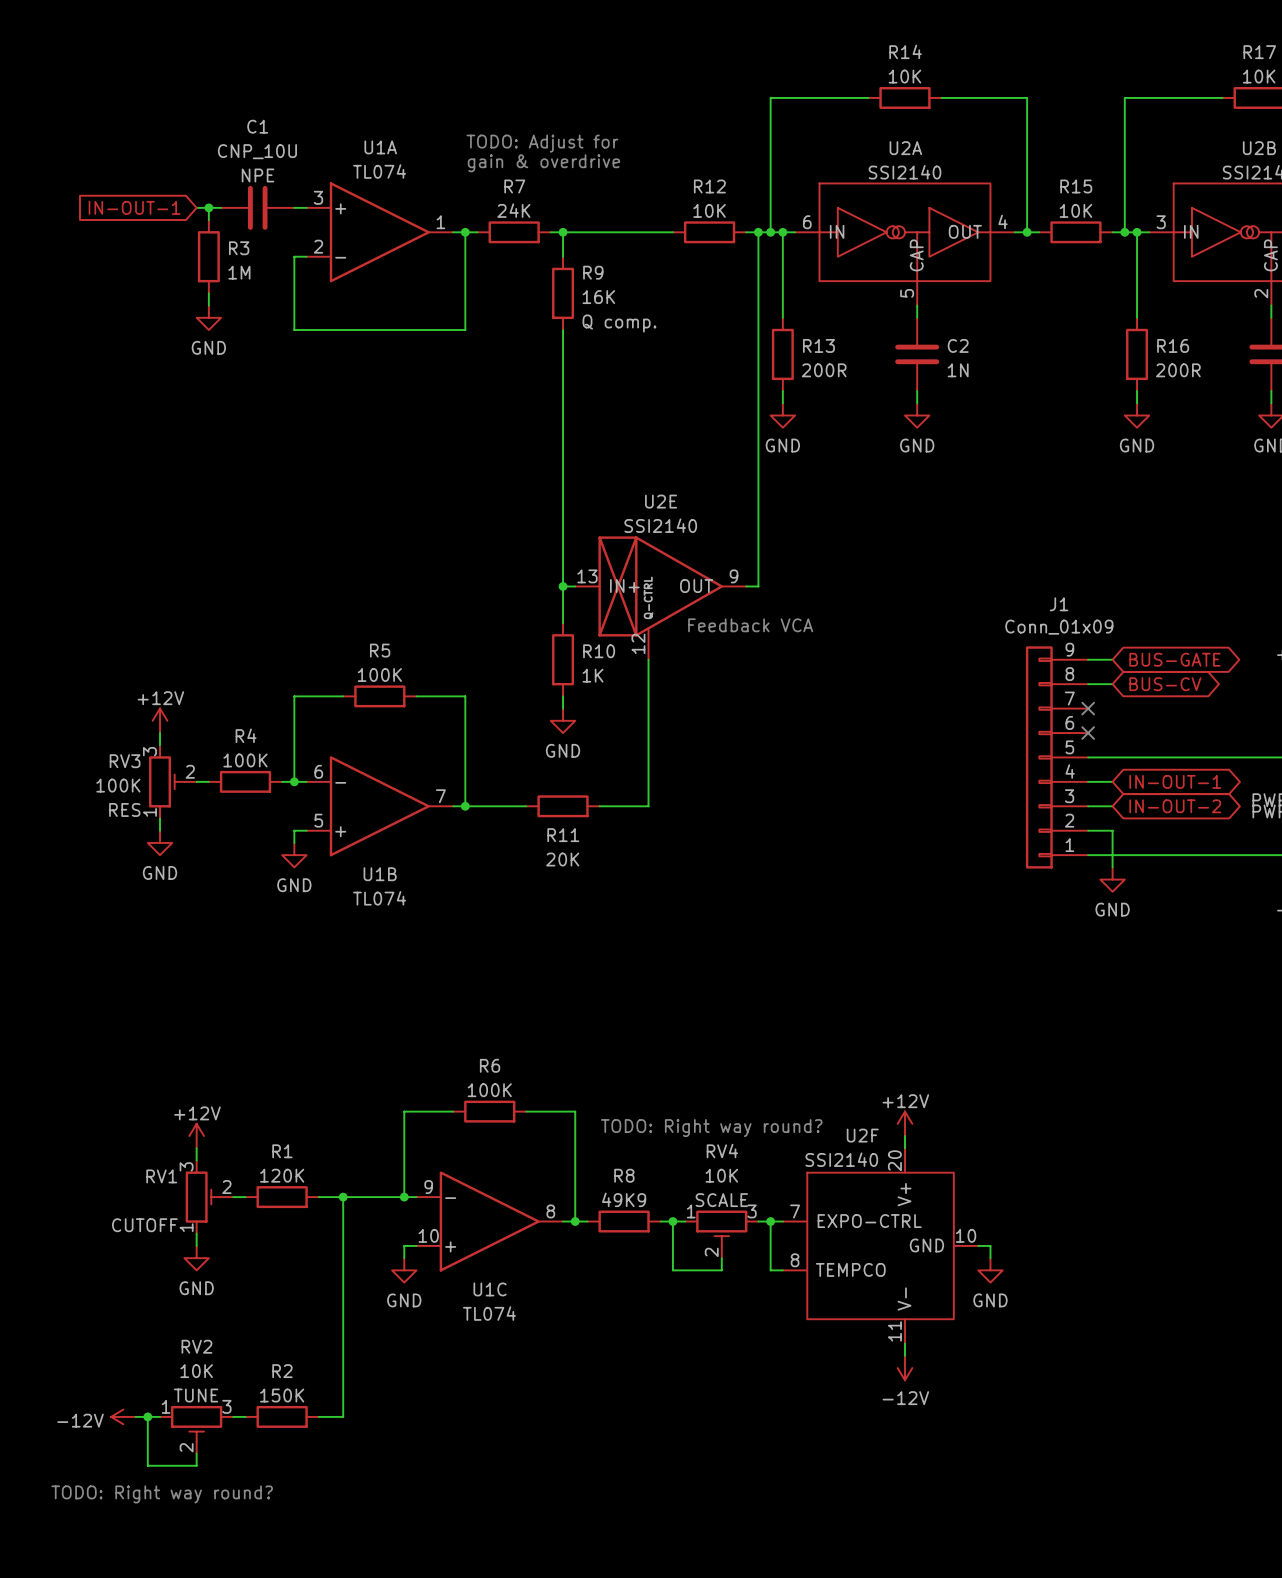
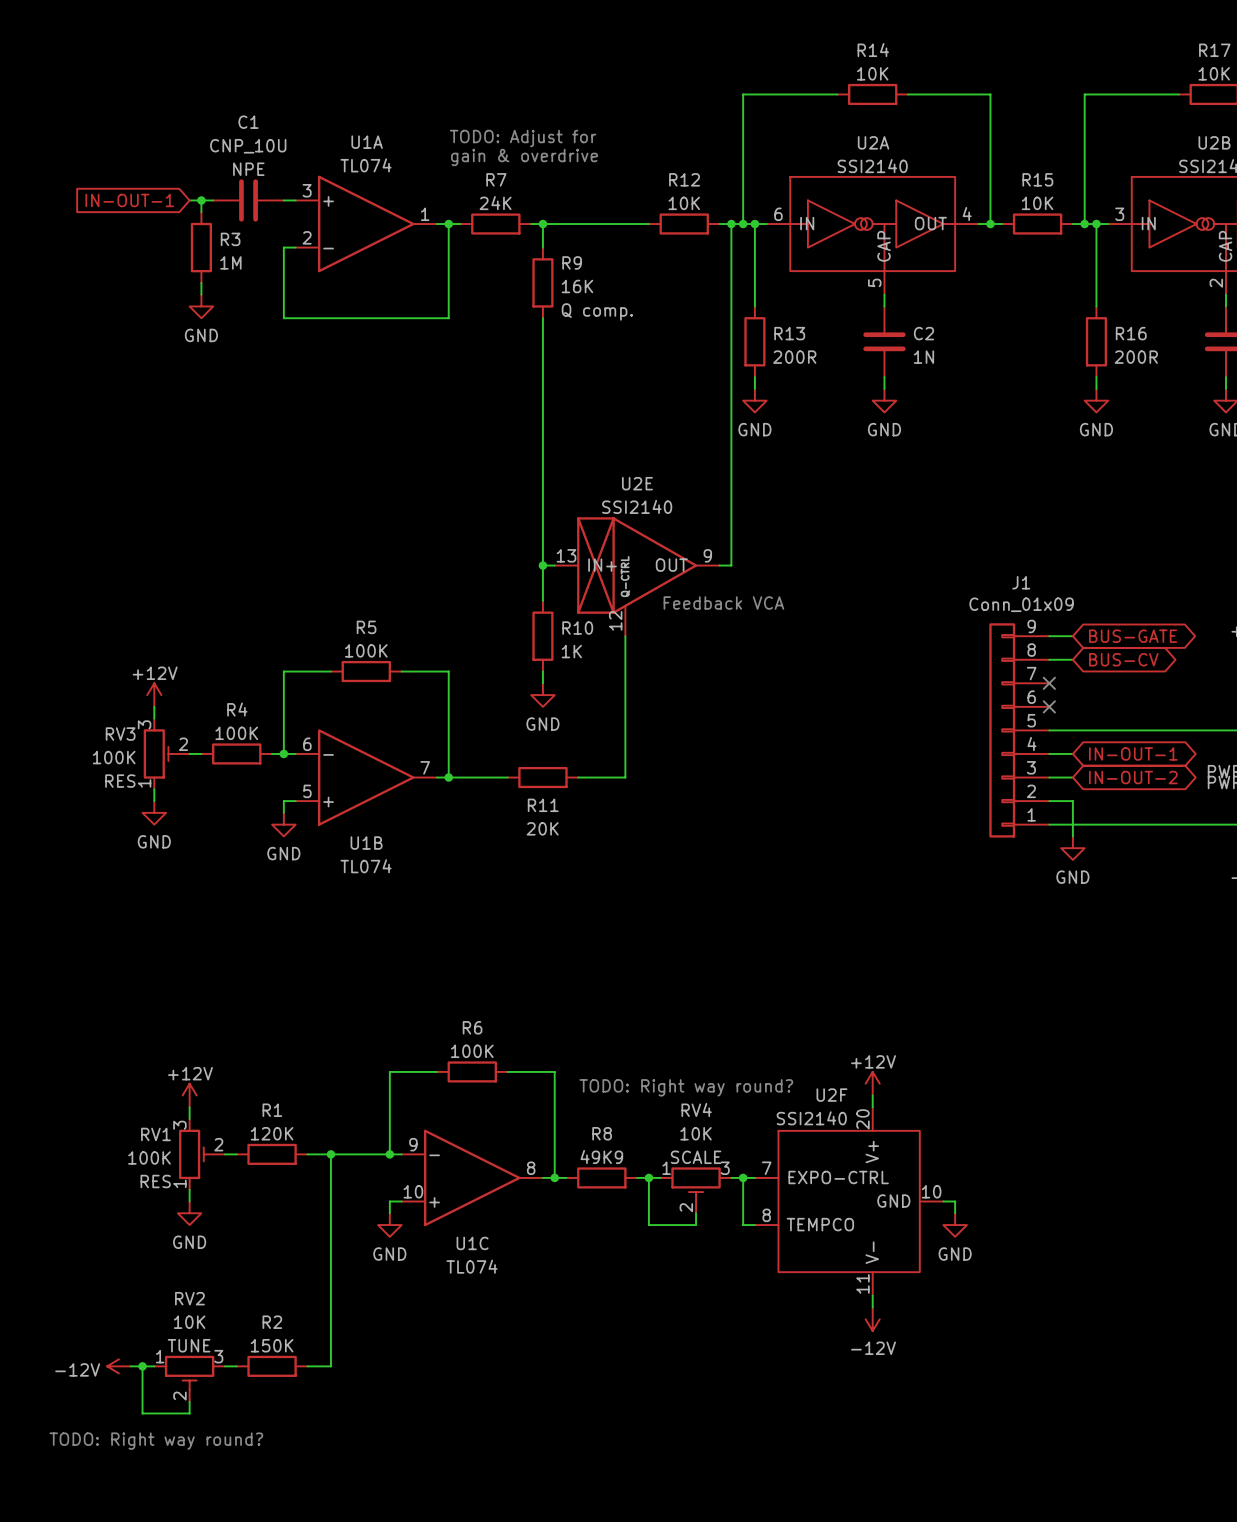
RV1 value: none -> 100K (149, 1157)
RV1 text: CUTOFF (144, 1225) -> RES (155, 1181)

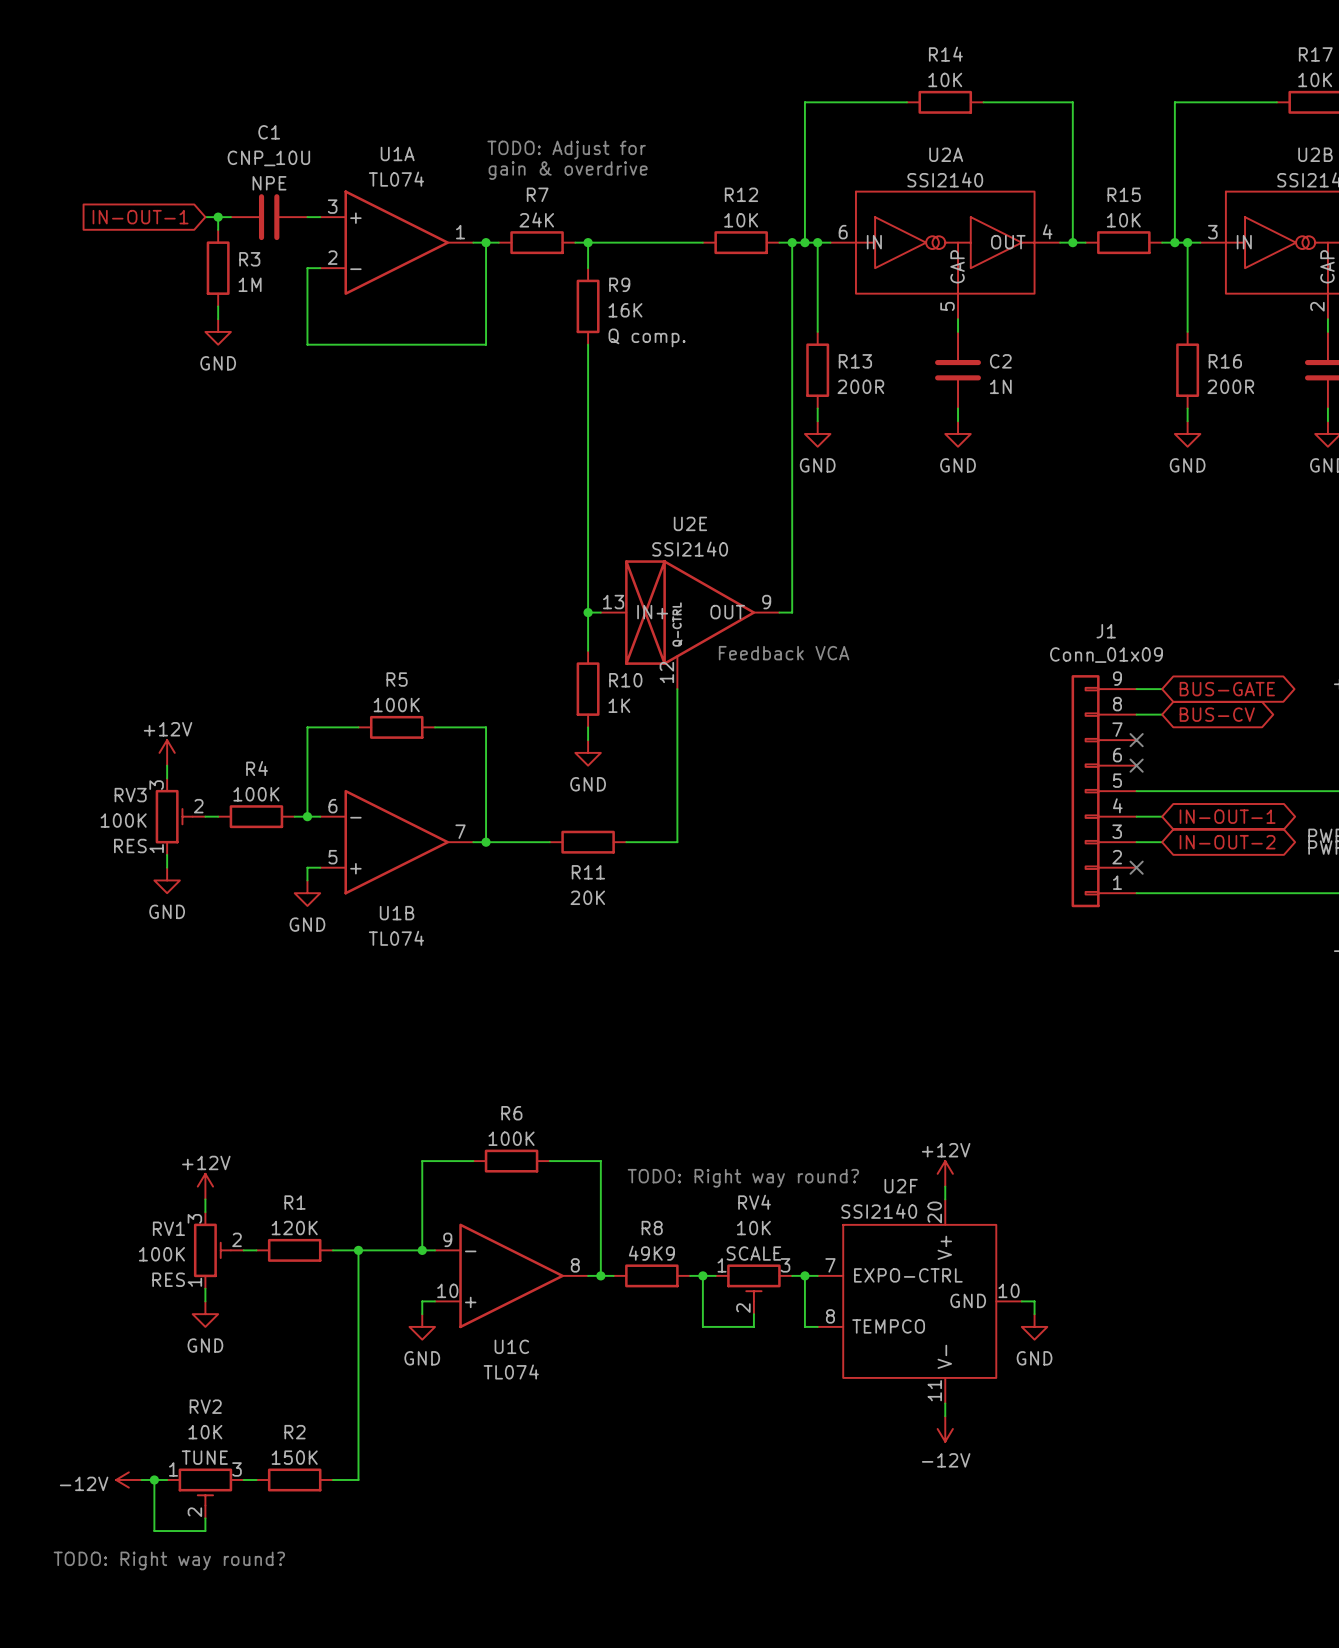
wire: (1049, 801) (1072, 801) (1072, 836) -> none
no-connect mark: none -> (1136, 867)
power symbol: GND (1072, 848) -> none

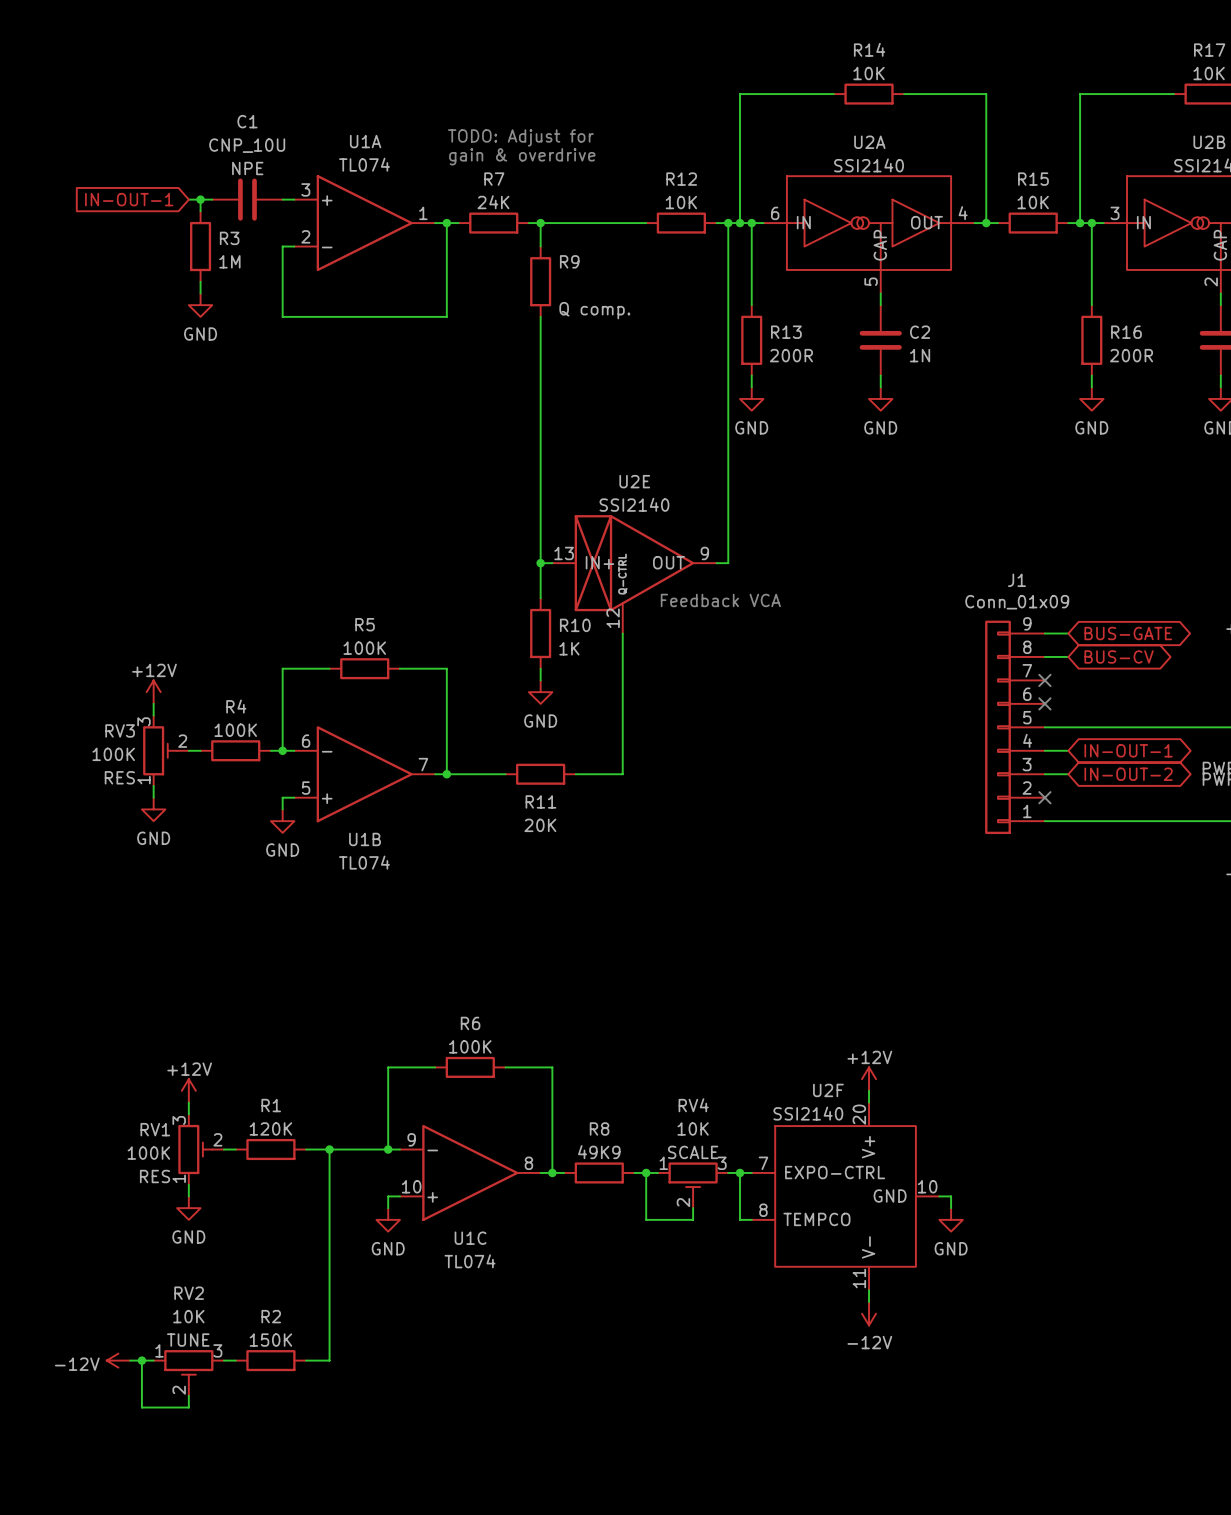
R9 value: 16K (625, 310) -> none
text: TODO: Right way round? (743, 1178) -> none
text: TODO: Right way round? (169, 1560) -> none

